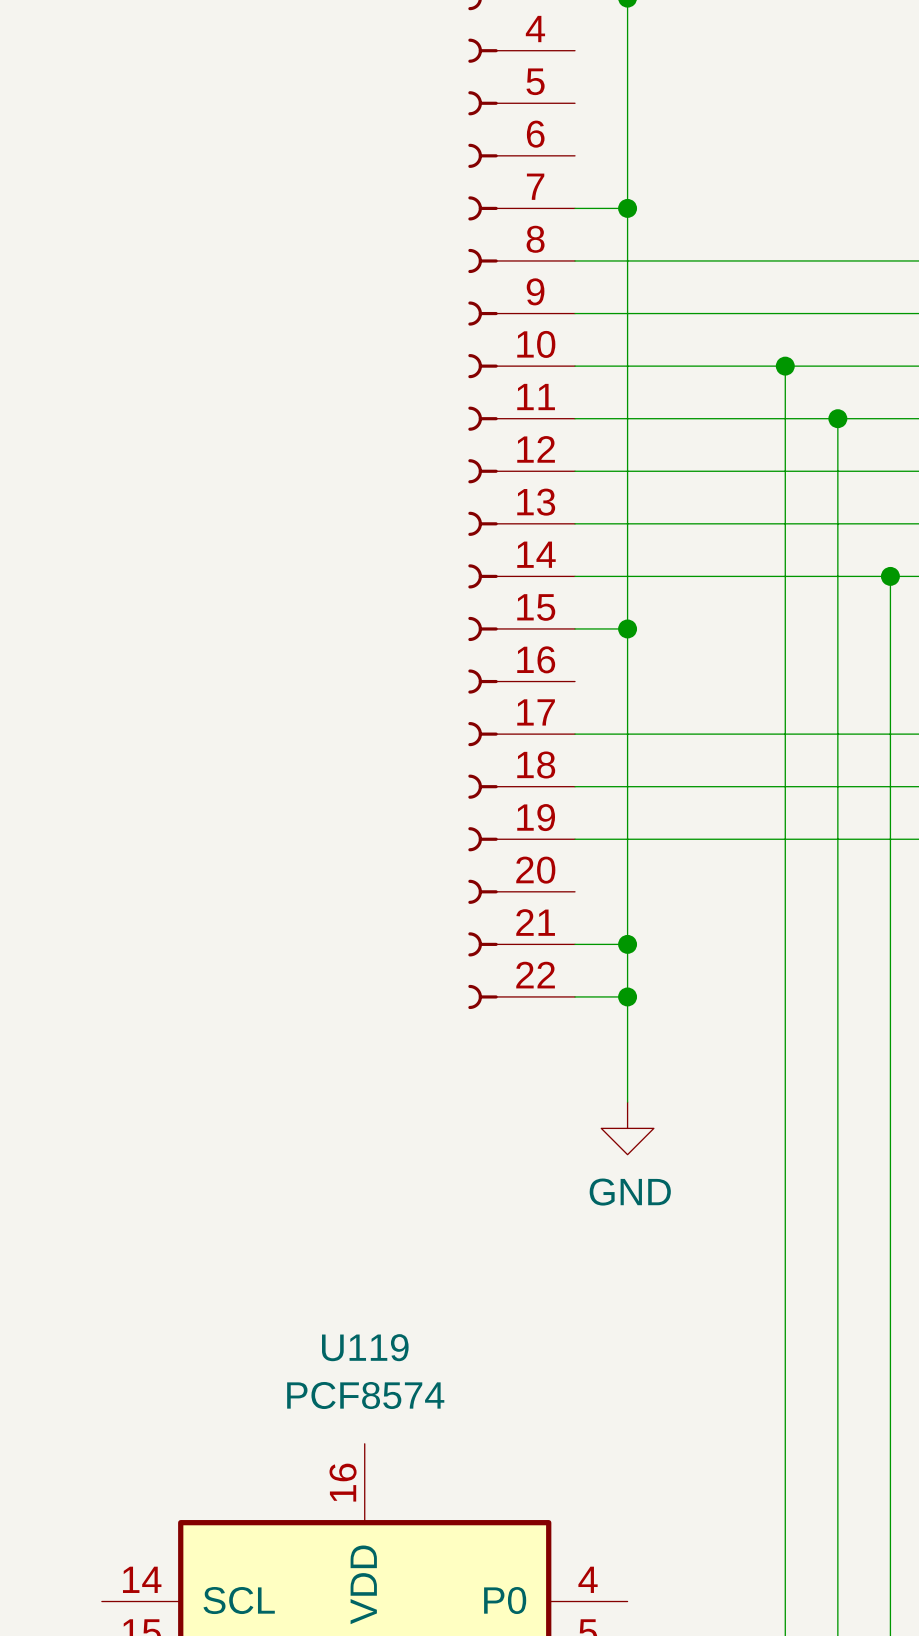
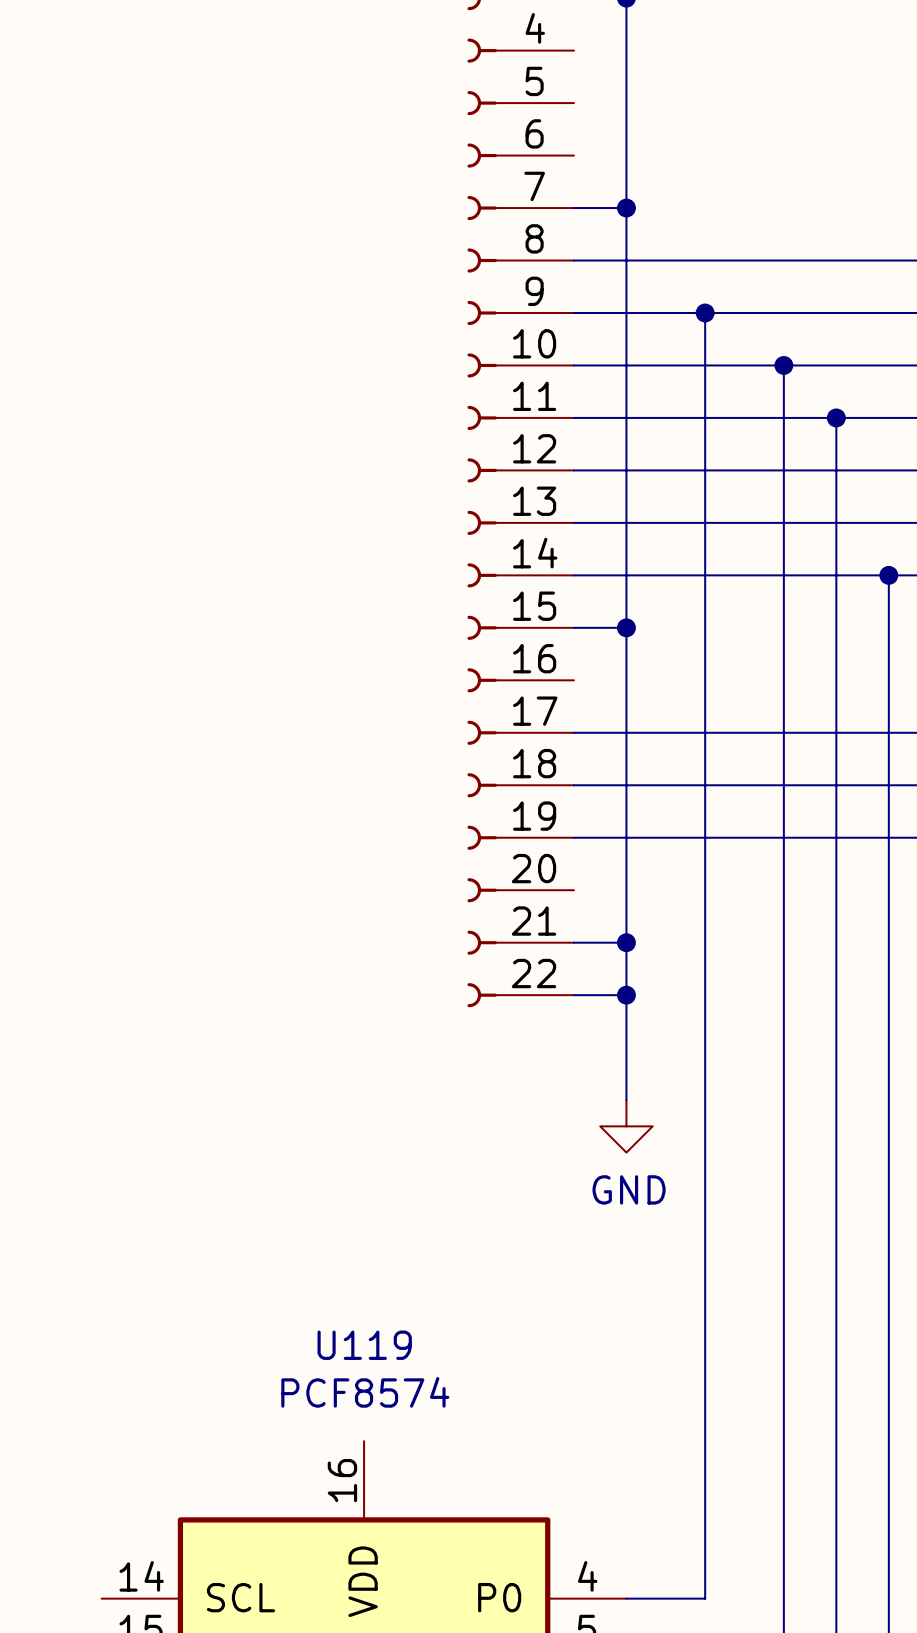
wire: none -> (705, 312) (705, 1598) (626, 1598)
junction: none -> (705, 312)

